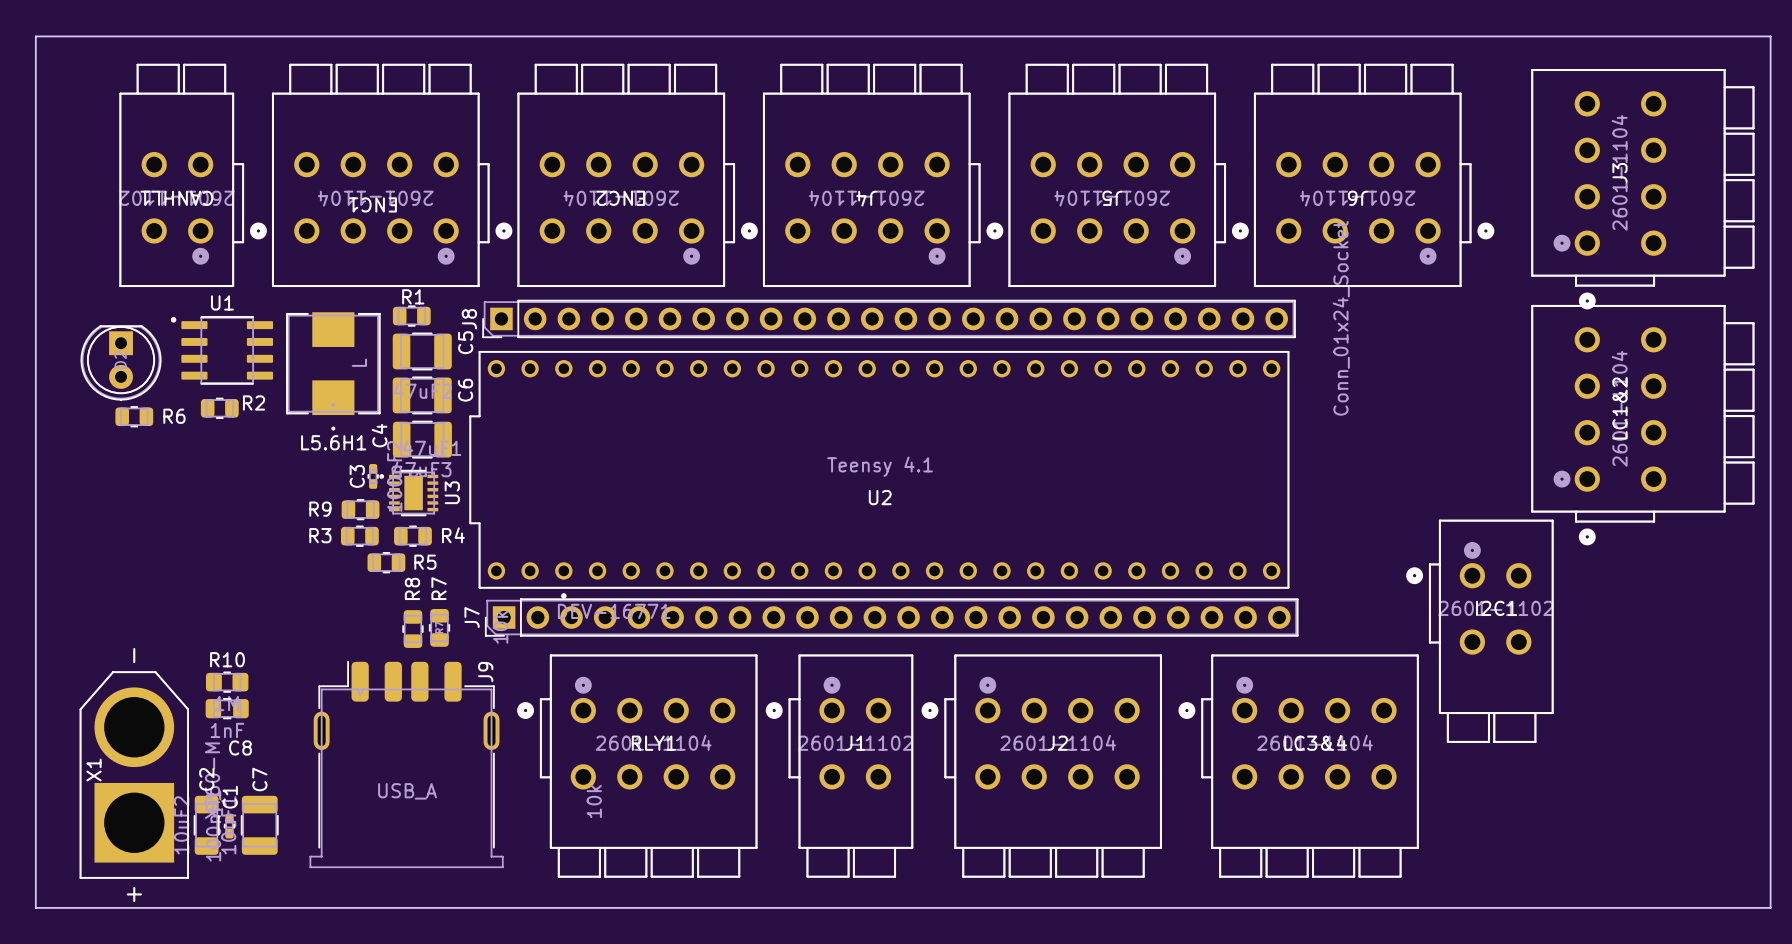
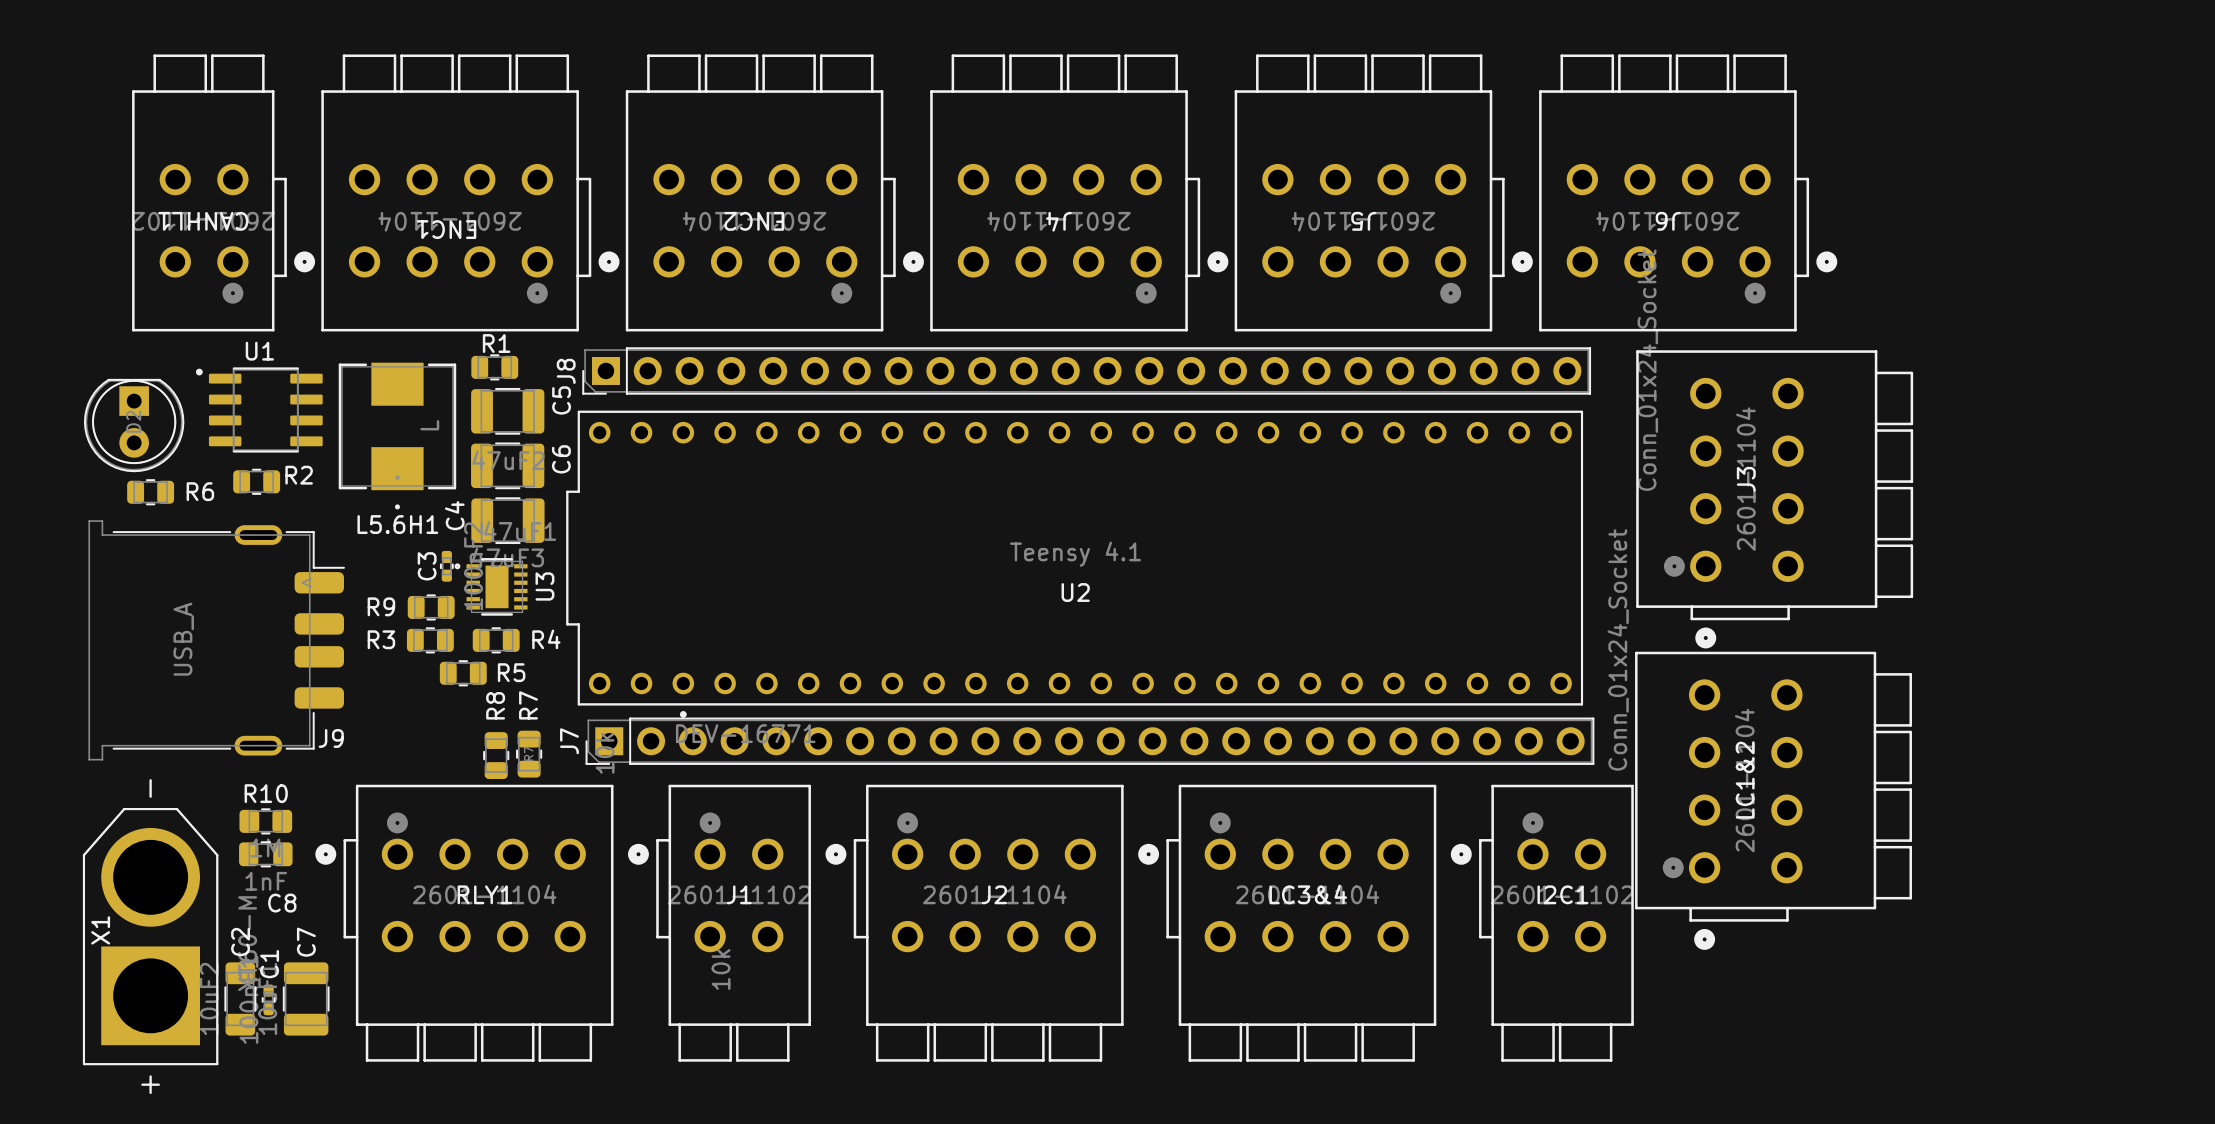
board edge: (35, 36) (1770, 36) (1770, 907) (35, 907) (35, 36) -> none
J3 position: (1642, 189) -> (1774, 499)
LC1&2 position: (1642, 425) -> (1773, 800)
J7 value: none -> Conn_01x24_Socket (1618, 649)
I2C1 position: (1479, 631) -> (1542, 923)
J9 rotation: 0° (406, 764) -> 90° clockwise (216, 640)
J9 position: (406, 764) -> (216, 640)
RLY1 position: (637, 766) -> (464, 923)
J1 position: (839, 766) -> (719, 923)
J2 position: (1041, 766) -> (974, 923)
LC3&4 position: (1298, 766) -> (1287, 923)

